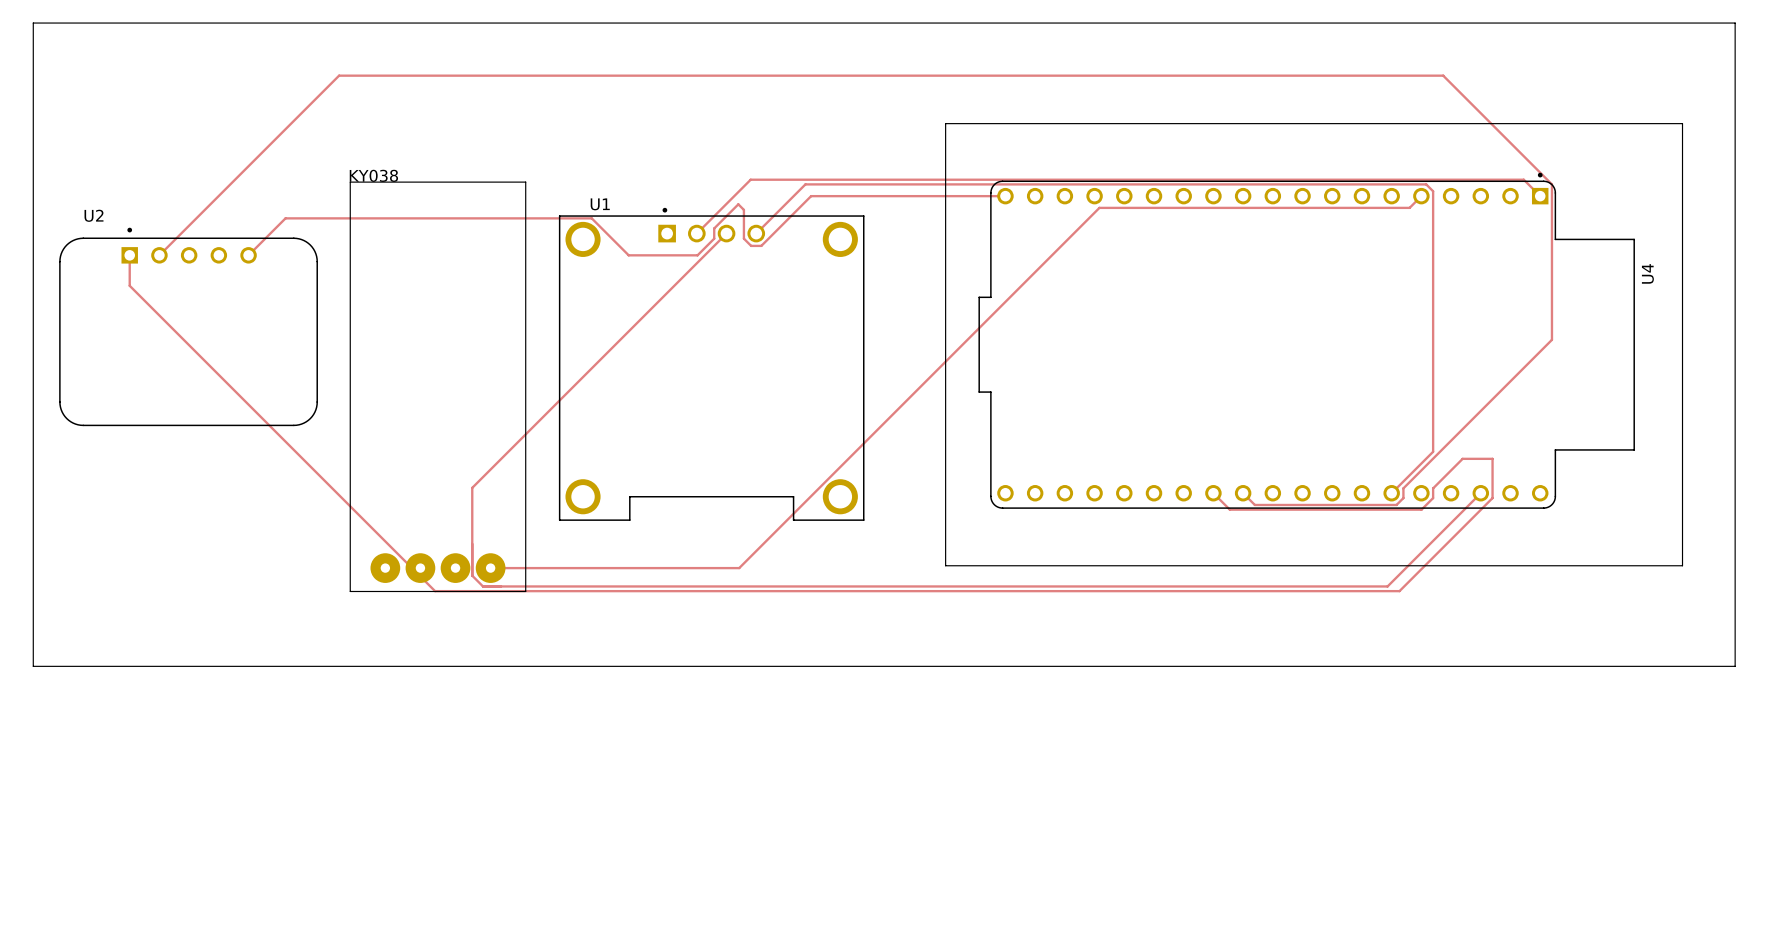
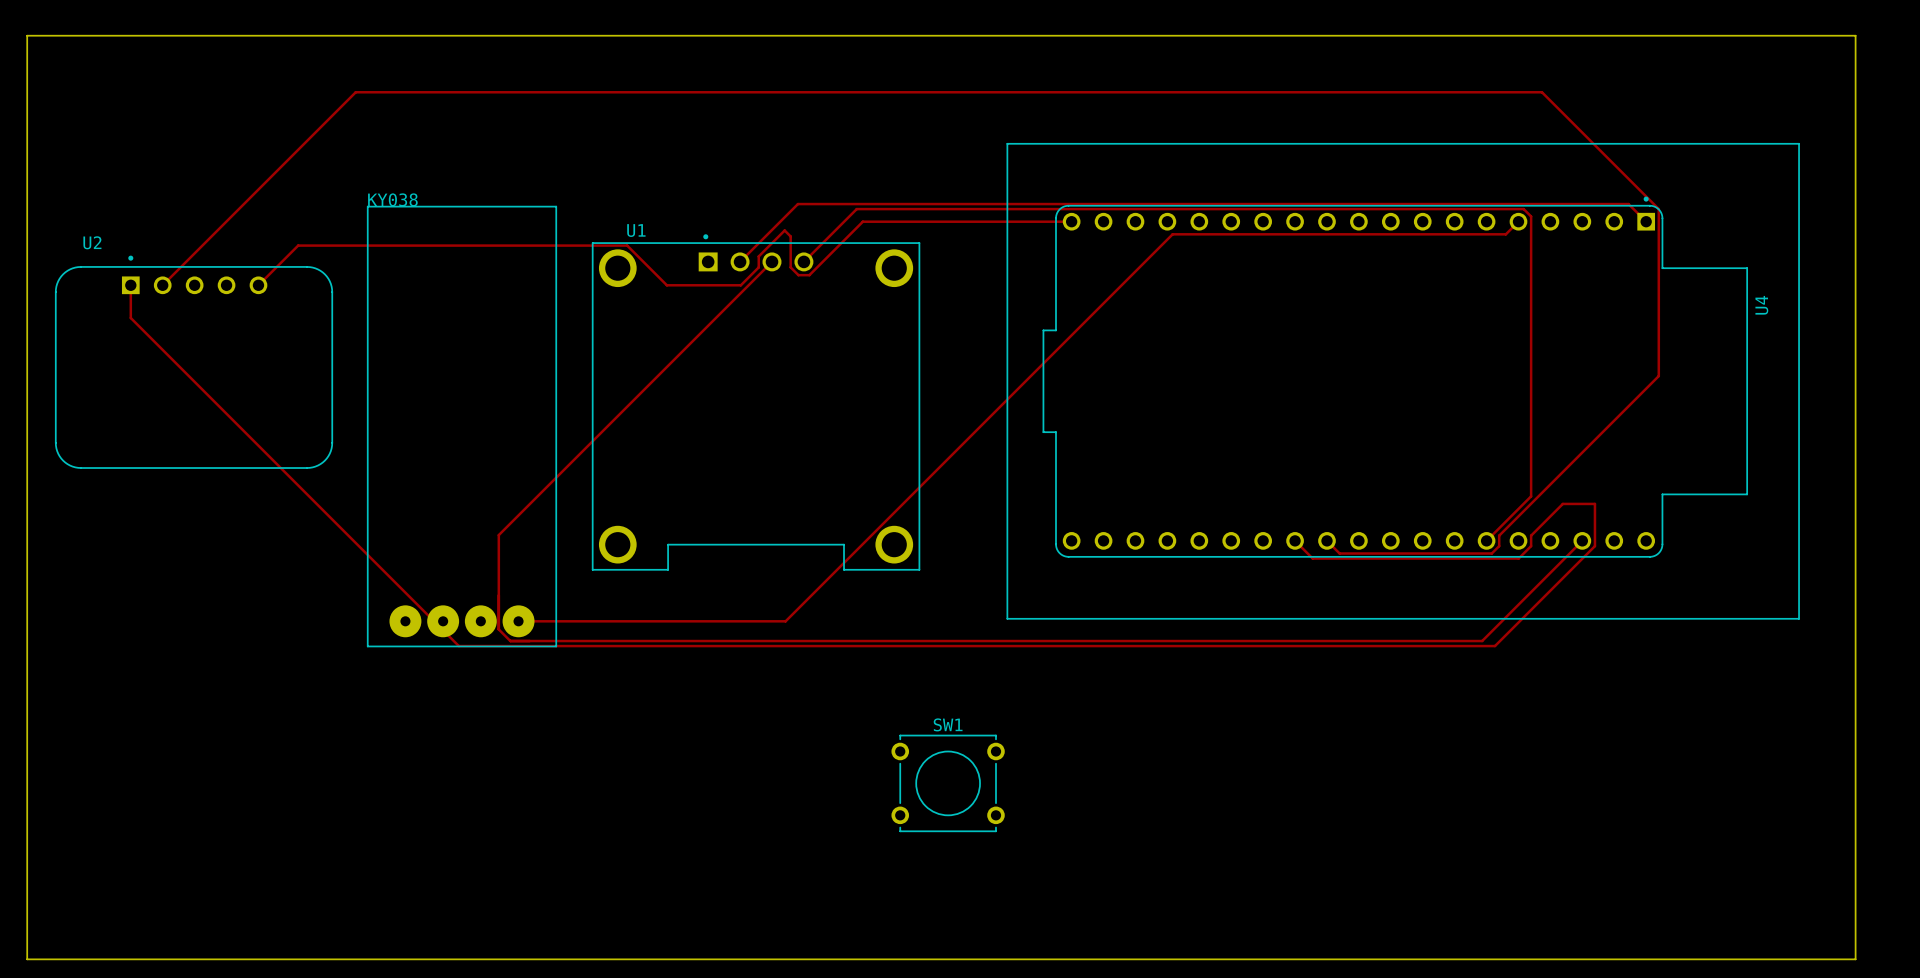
board edge: (33, 666) (1735, 666) -> (27, 726) (27, 959) (1855, 959) (1855, 726)
SW1: none -> (948, 783)

